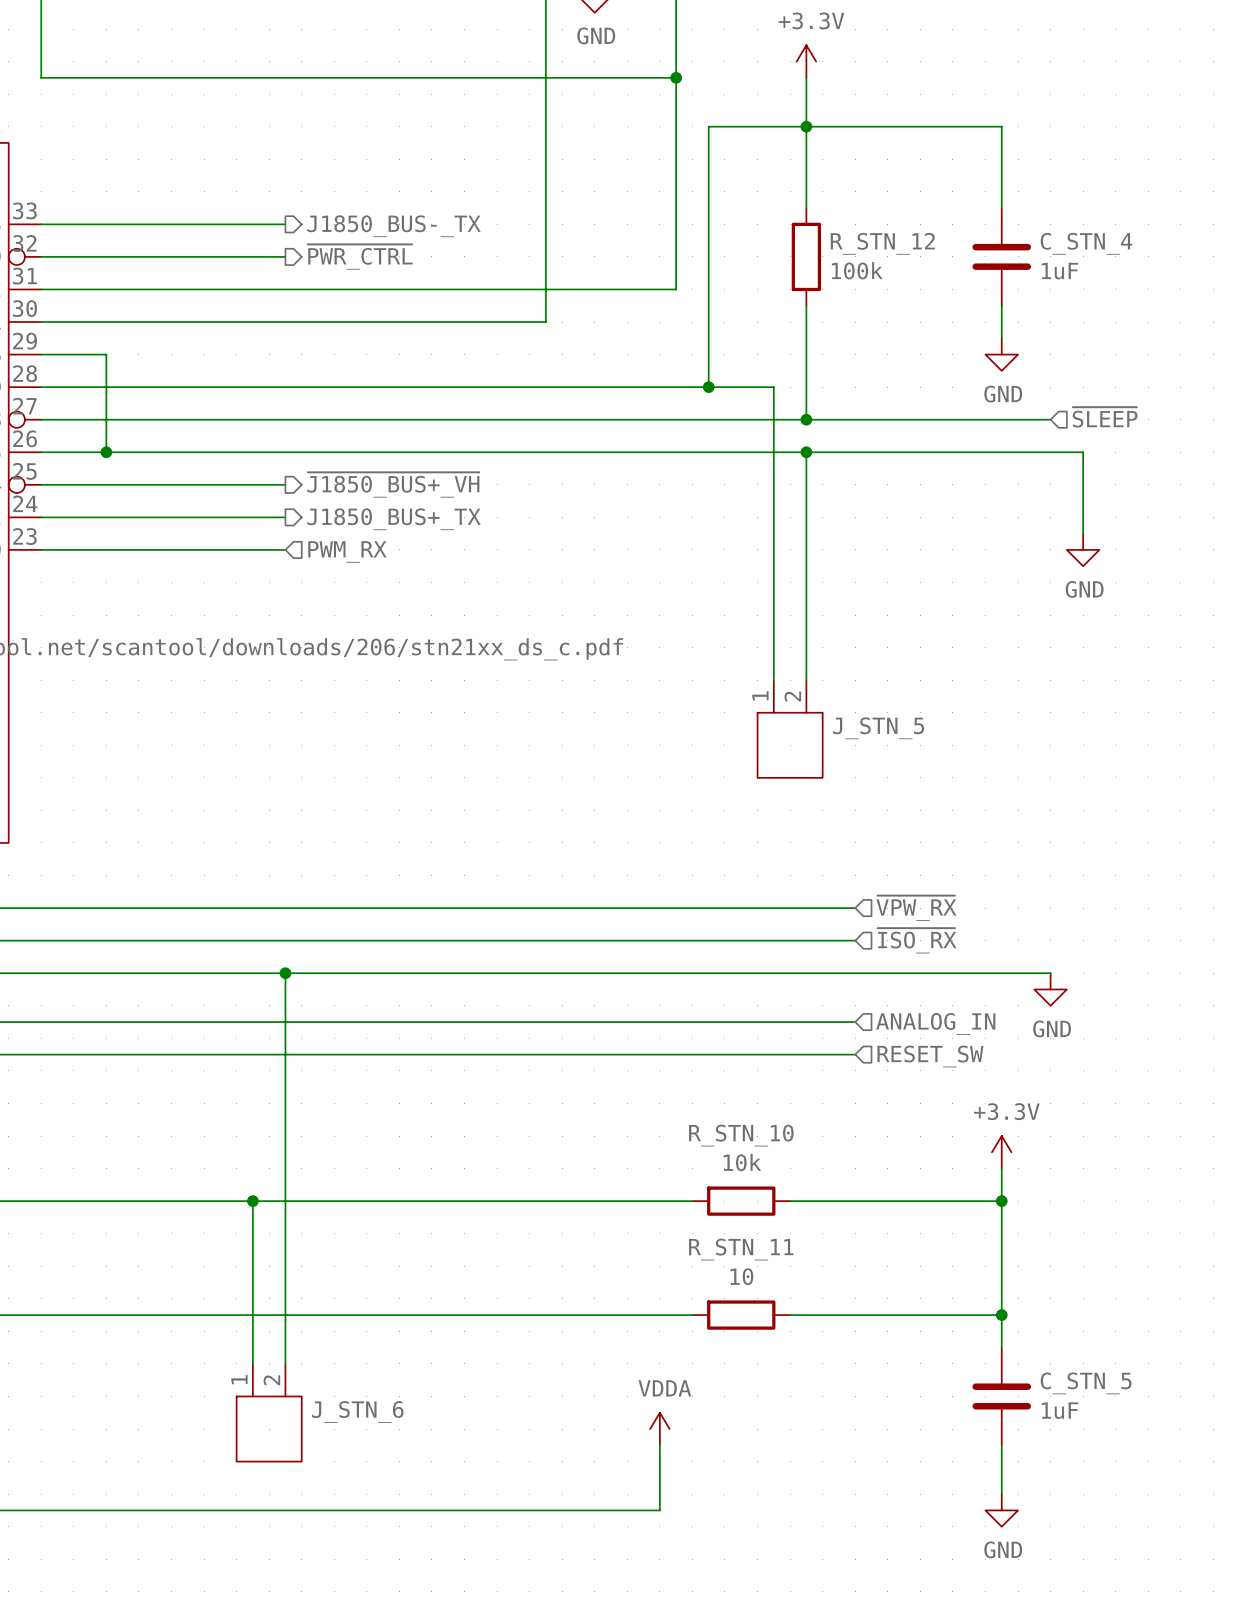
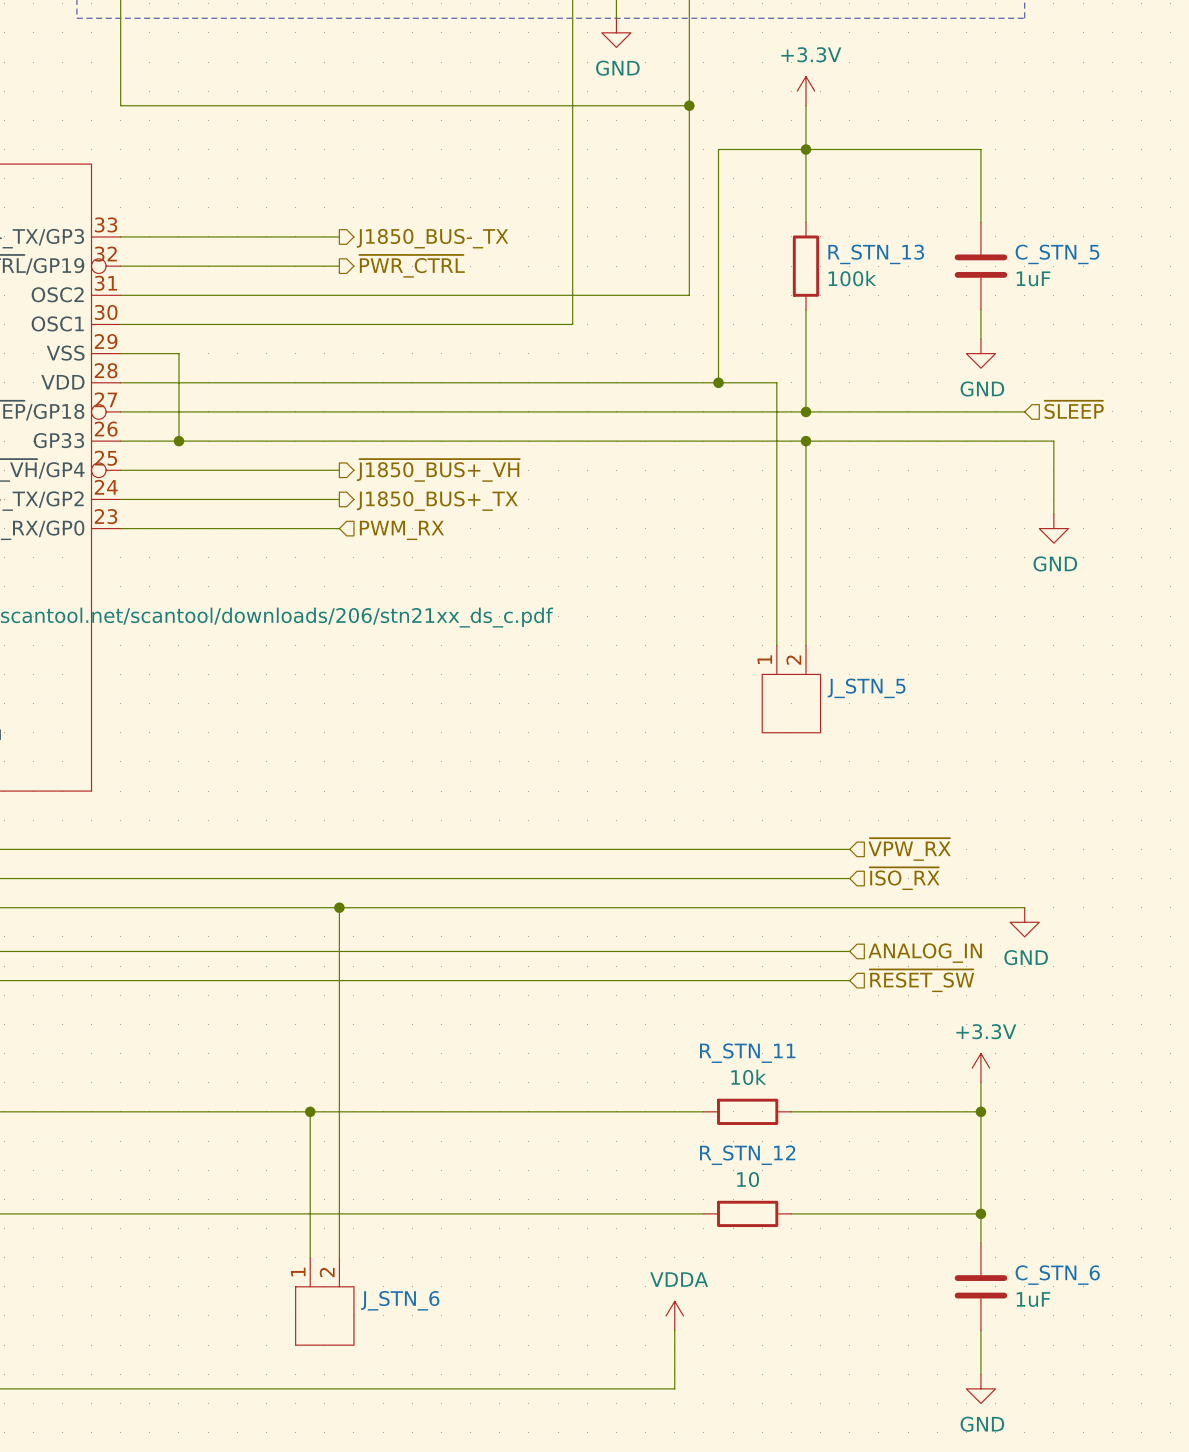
R_STN_12 name: R_STN_12 (882, 243) -> R_STN_13 (876, 254)
C_STN_4 name: C_STN_4 (1086, 243) -> C_STN_5 (1057, 254)
hierarchical label: RESET_SW (930, 1056) -> ~{RESET_SW} (921, 980)
R_STN_10 name: R_STN_10 (741, 1135) -> R_STN_11 (747, 1053)
R_STN_11 name: R_STN_11 (741, 1249) -> R_STN_12 (747, 1155)
C_STN_5 name: C_STN_5 (1086, 1383) -> C_STN_6 (1057, 1275)

